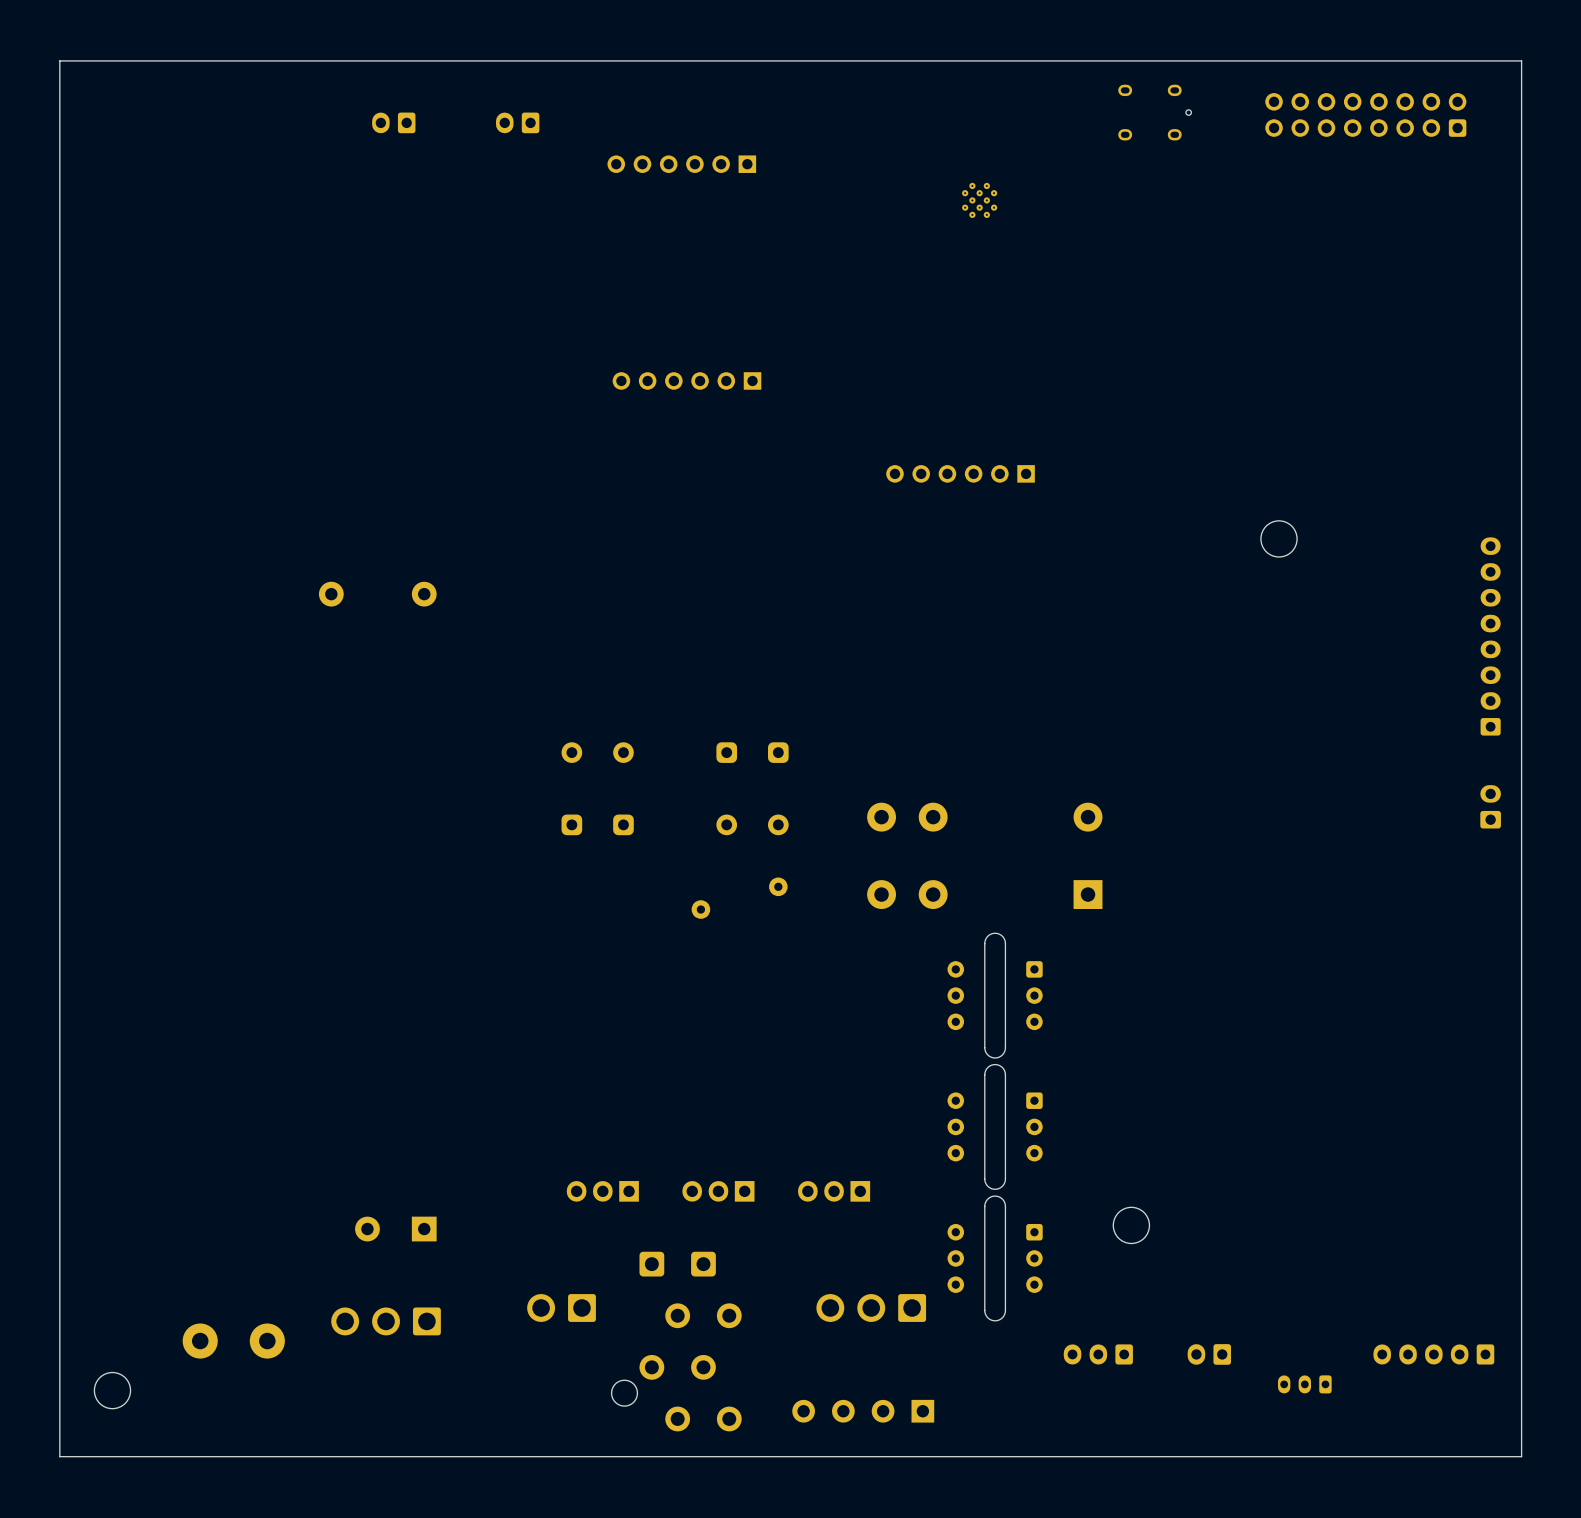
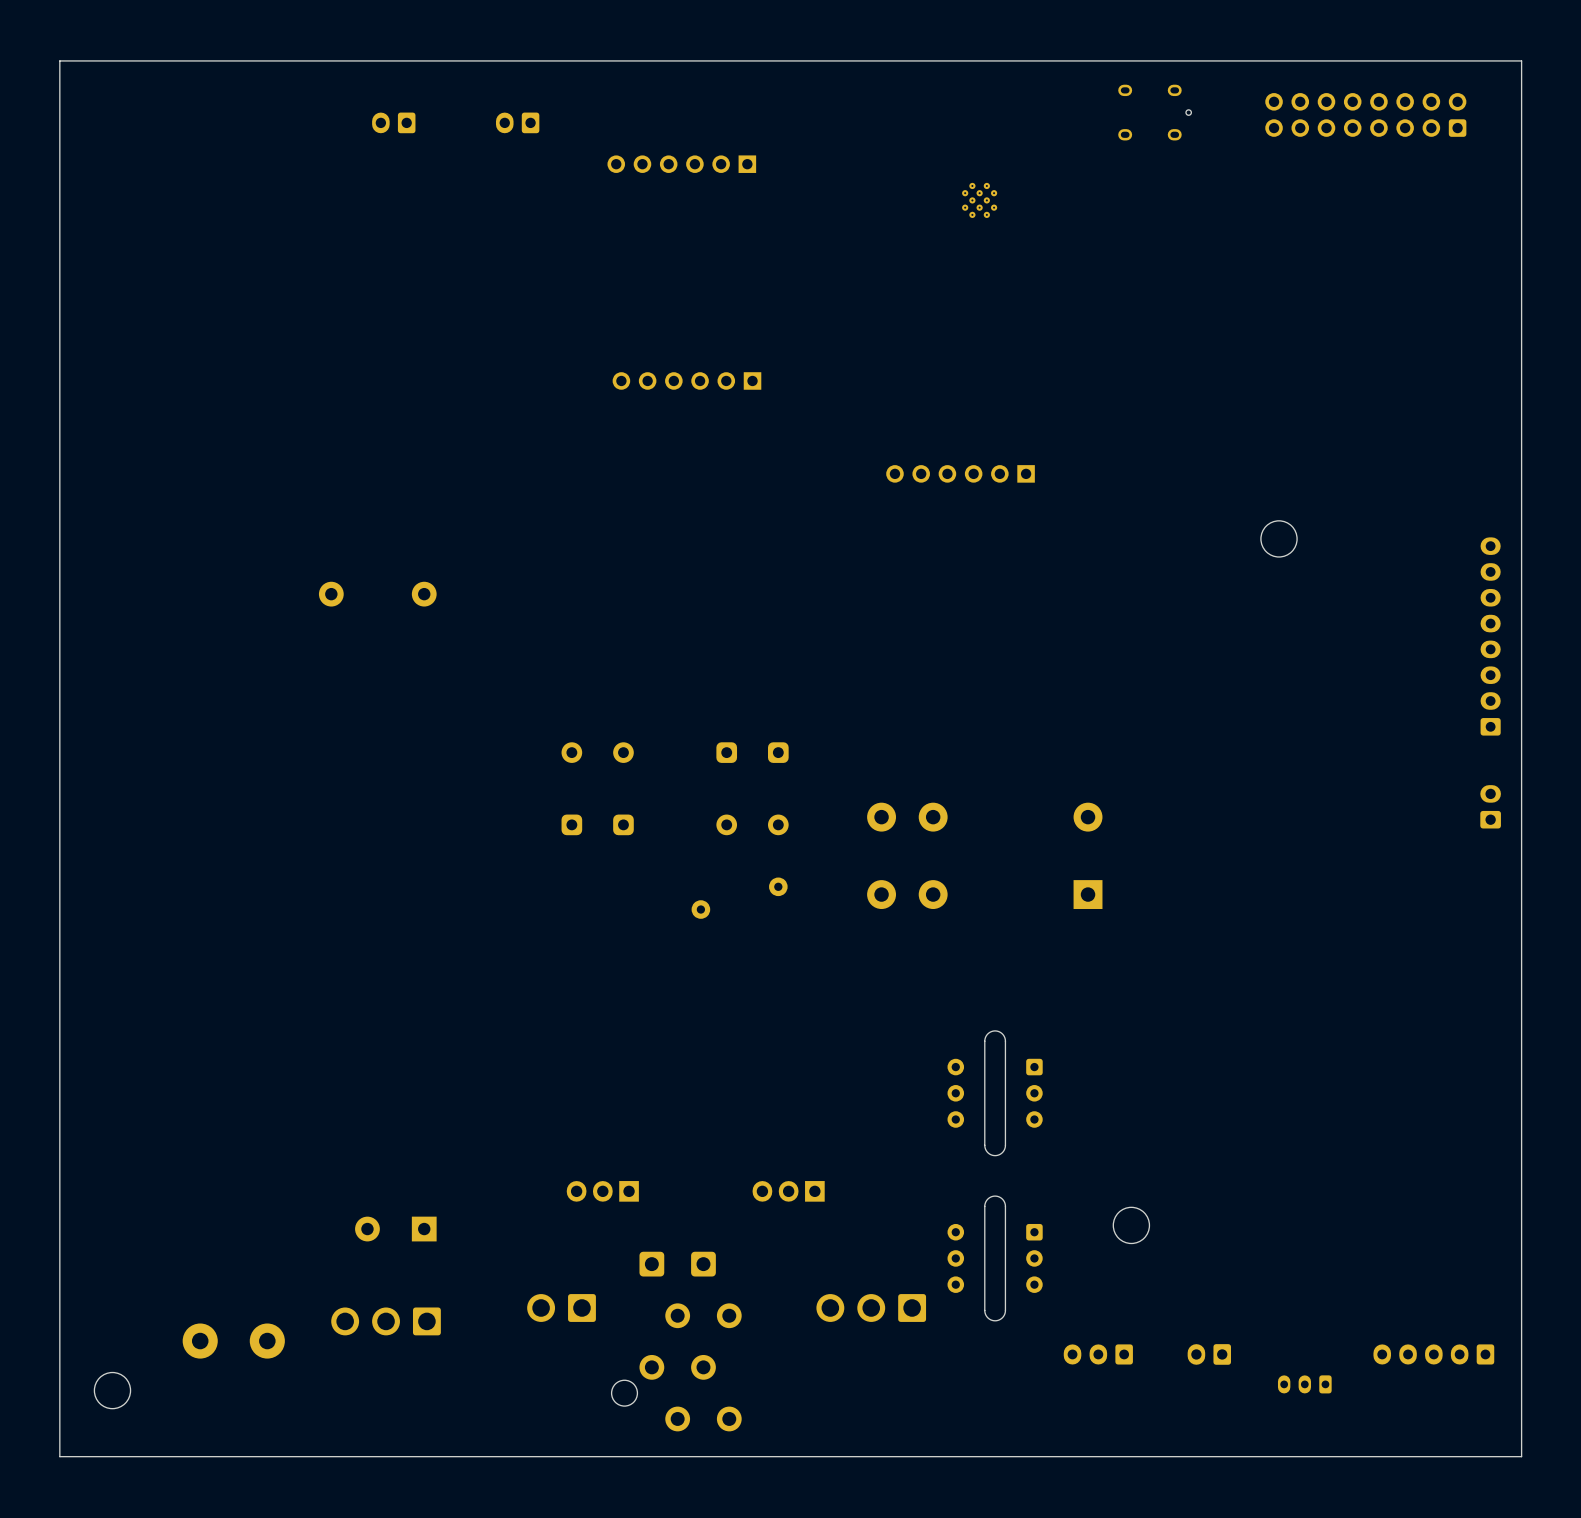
part: (995, 995) -> none
part position: (995, 1126) -> (995, 1093)
part: (718, 1191) -> none
part: none -> (788, 1191)
part: (834, 1191) -> none
part: (863, 1411) -> none

